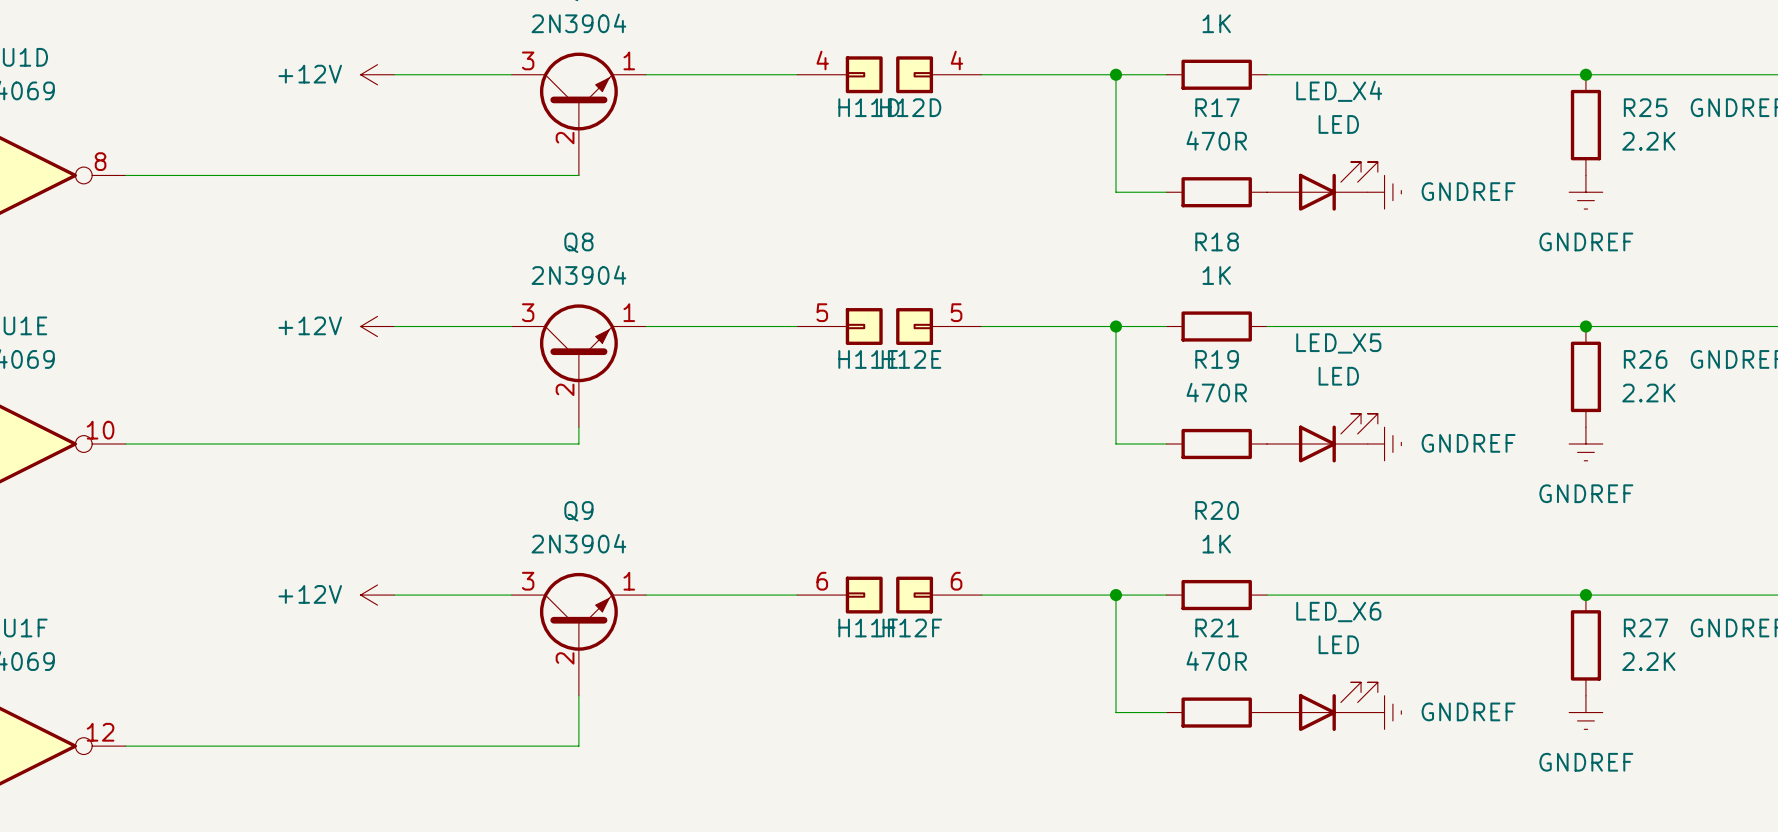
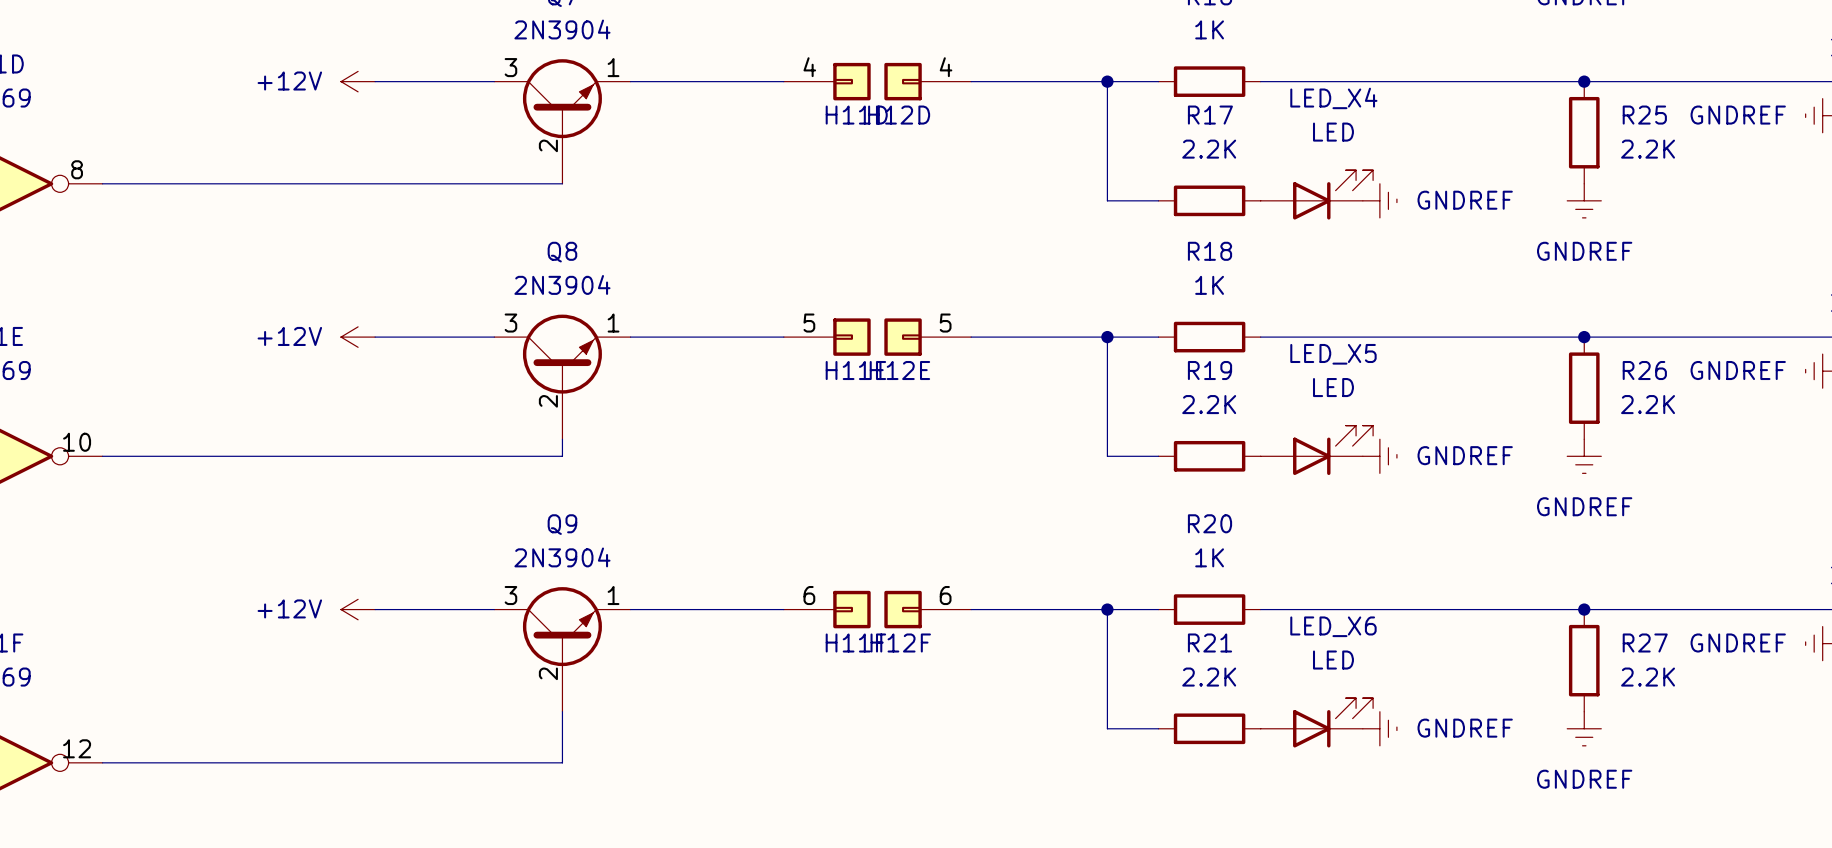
R17 value: 470R (1216, 140) -> 2.2K (1209, 149)
R19 value: 470R (1216, 392) -> 2.2K (1209, 404)
R21 value: 470R (1216, 661) -> 2.2K (1209, 677)

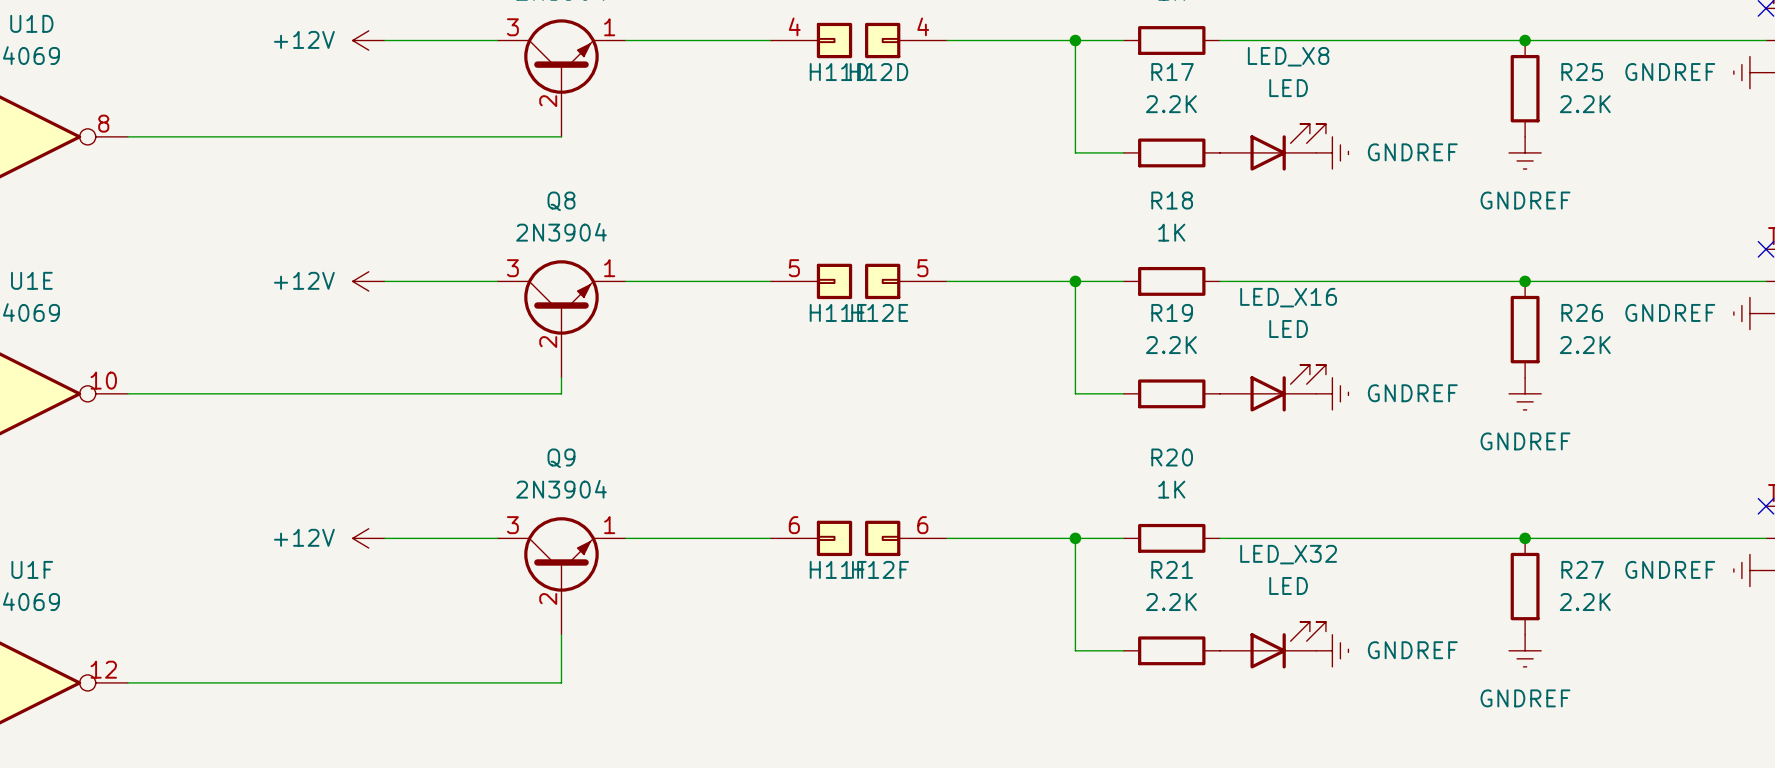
LED_X4 name: LED_X4 (1333, 98) -> LED_X8 (1288, 56)
LED_X5 name: LED_X5 (1333, 354) -> LED_X16 (1288, 297)
LED_X6 name: LED_X6 (1333, 626) -> LED_X32 (1288, 554)

